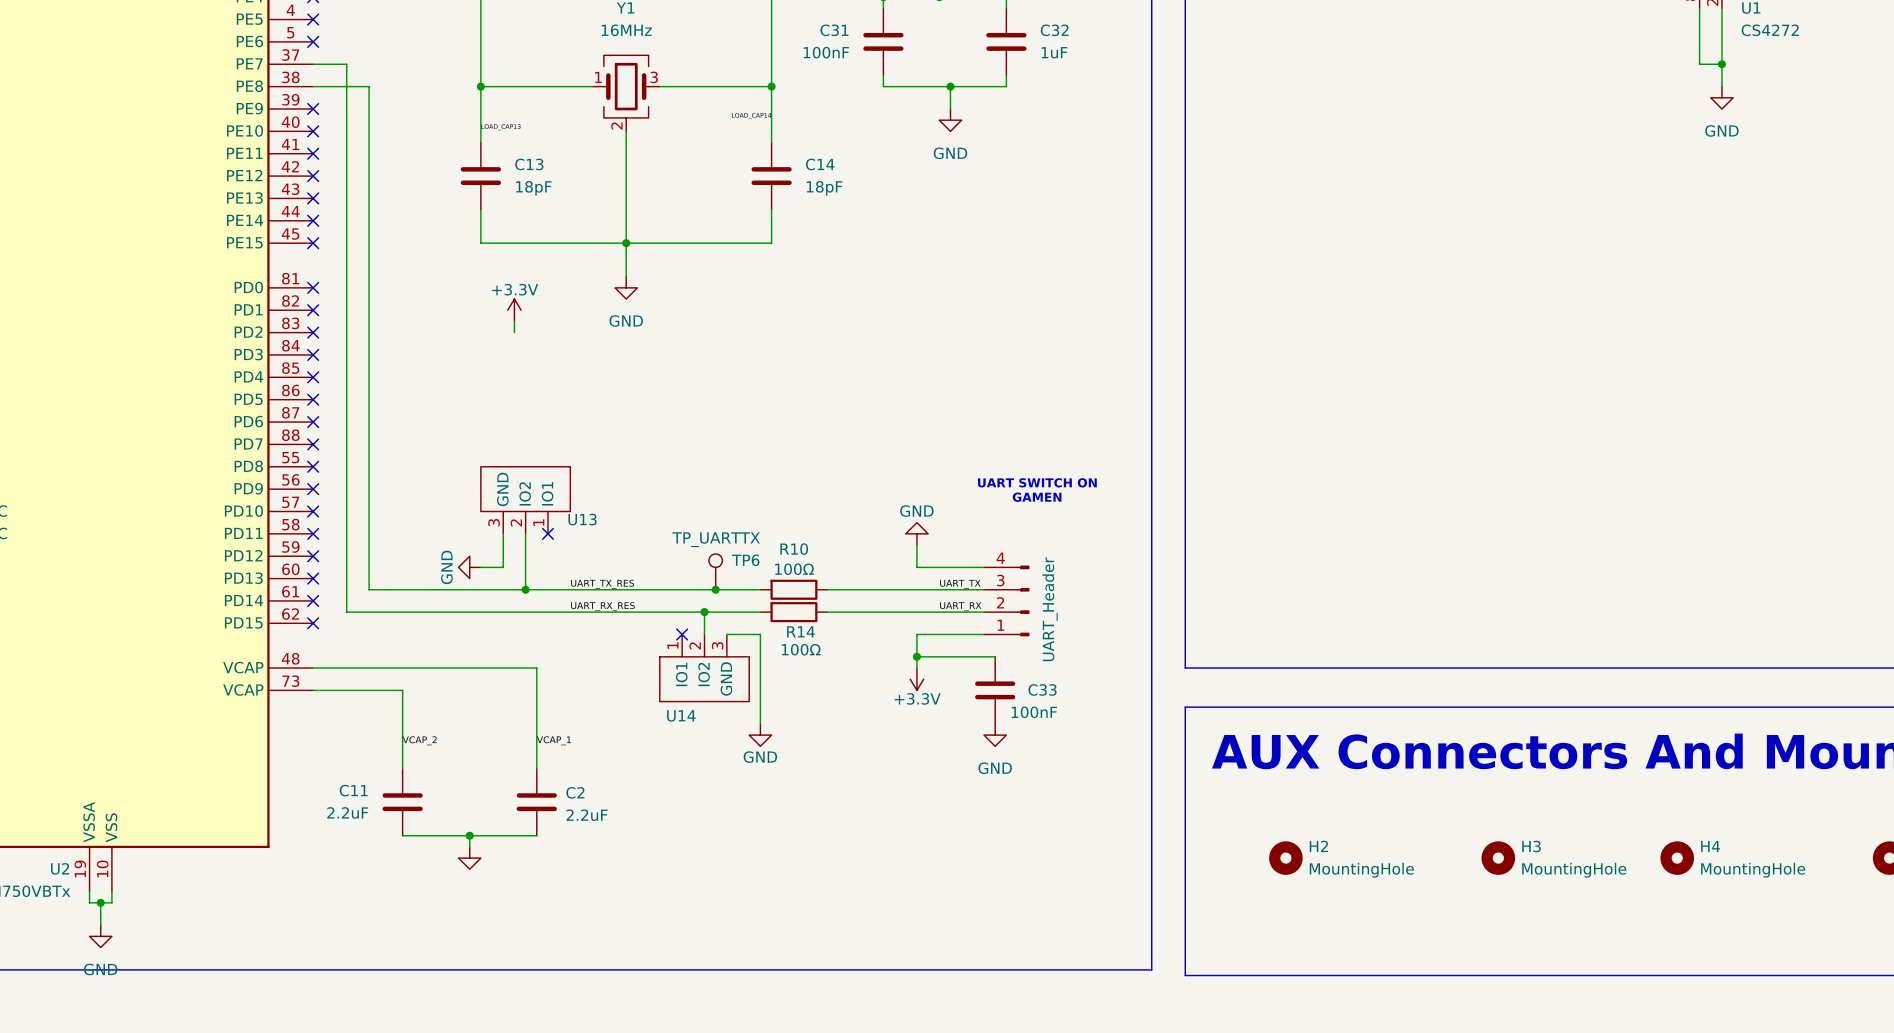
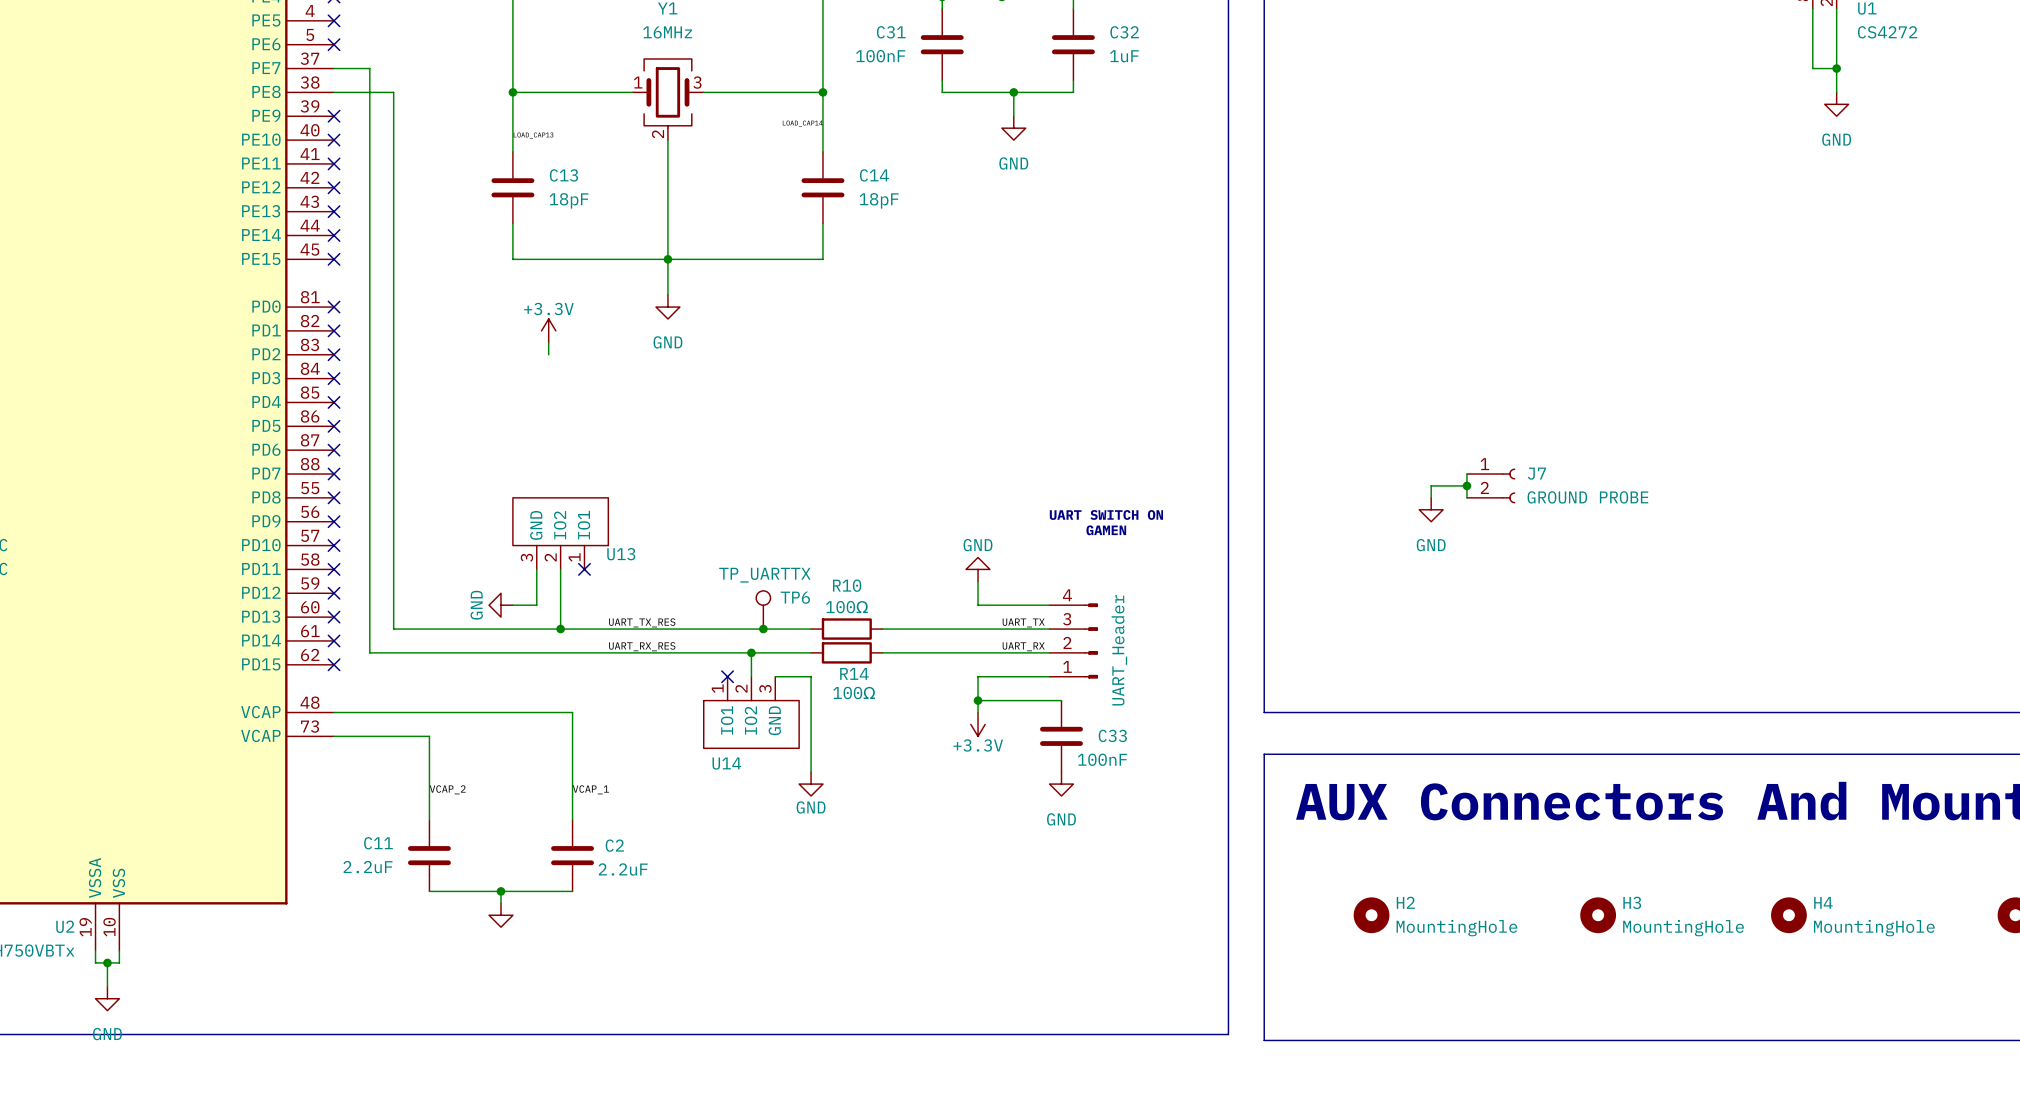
wire: none -> (1466, 474) (1466, 497)
wire: none -> (1466, 485) (1431, 485) (1431, 497)
junction: none -> (1466, 485)
J7: none -> GROUND PROBE (1491, 485)
power symbol: none -> GND (1431, 509)

